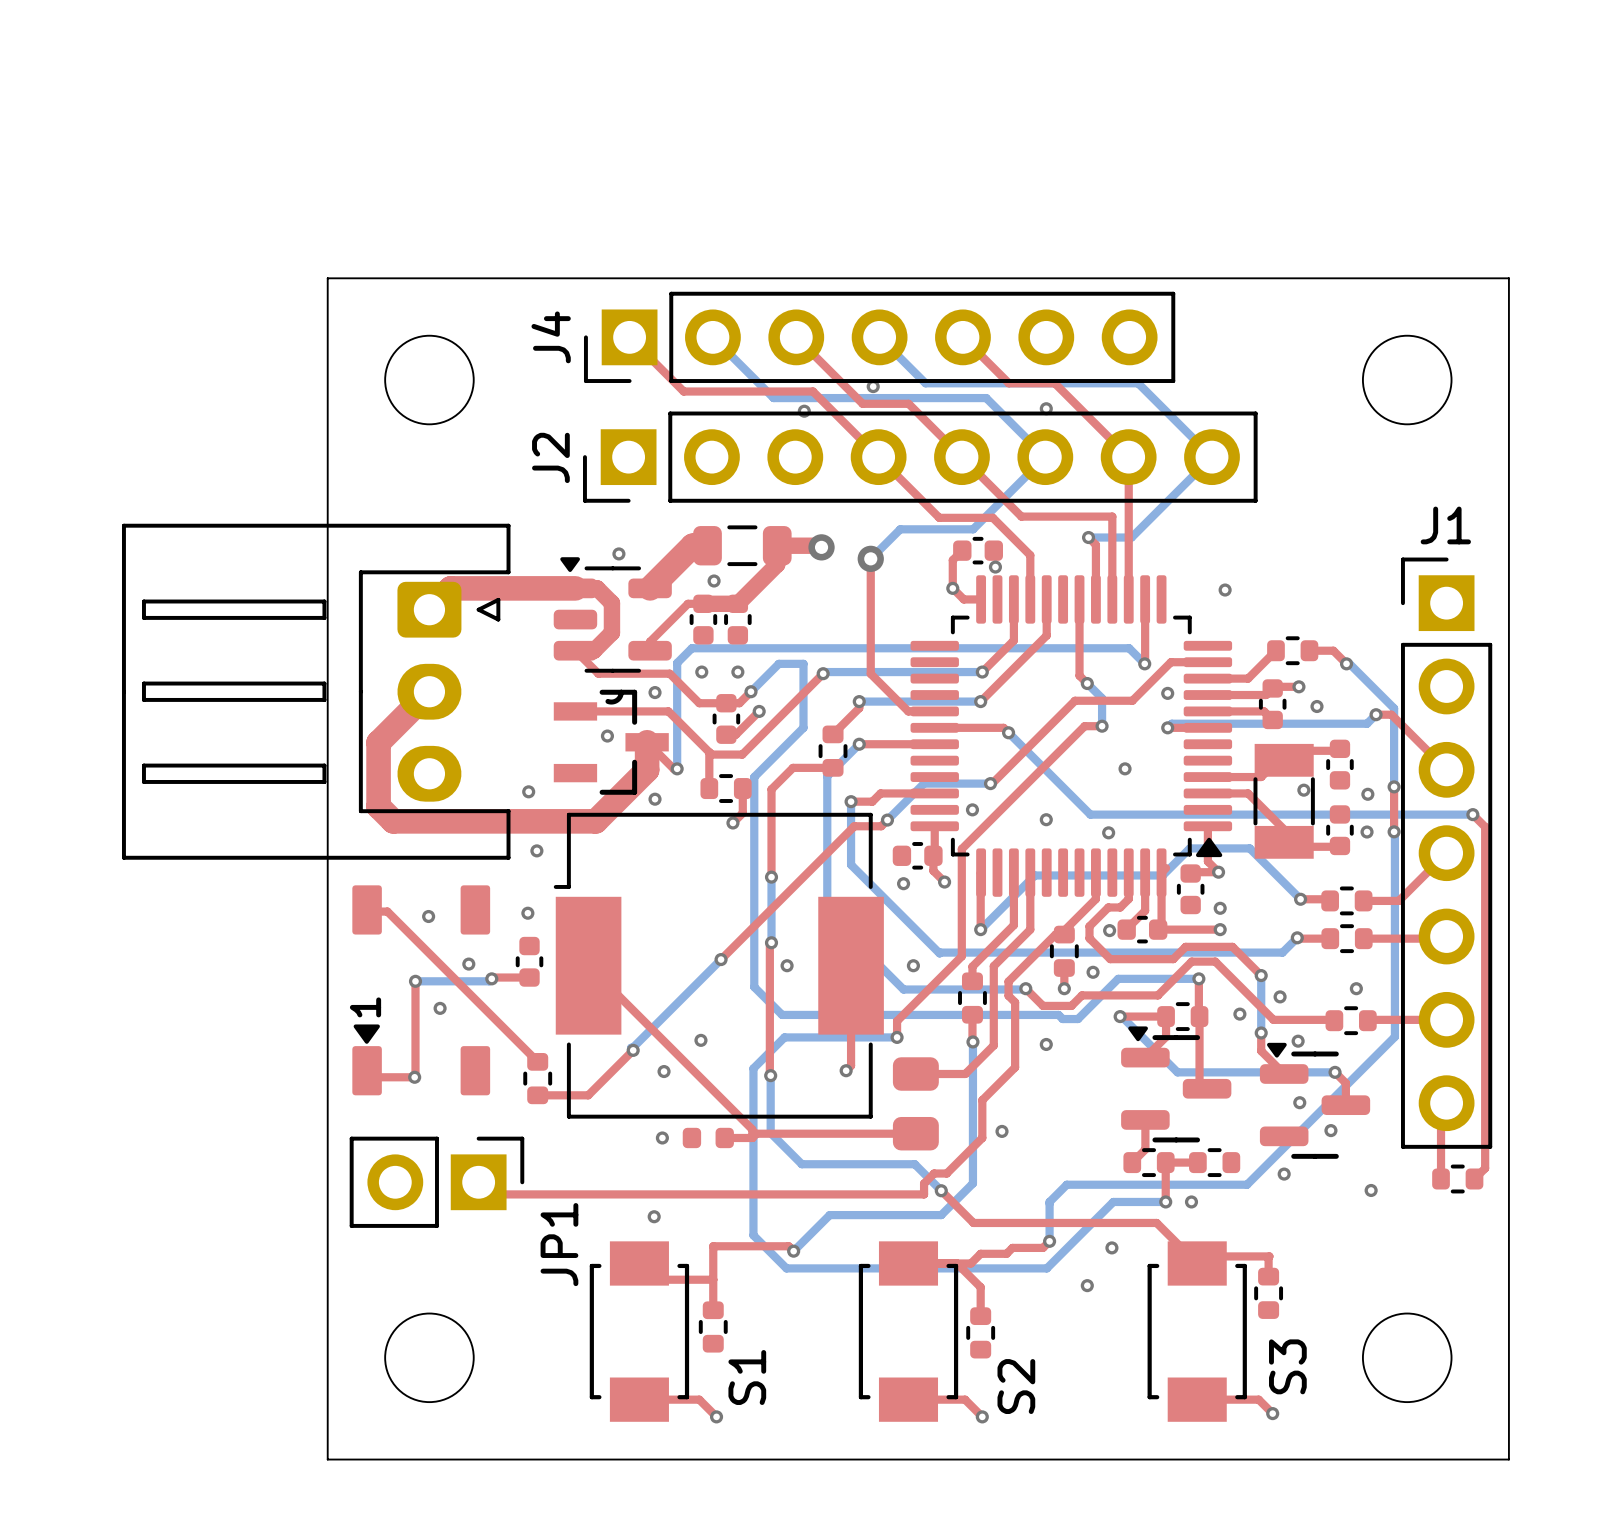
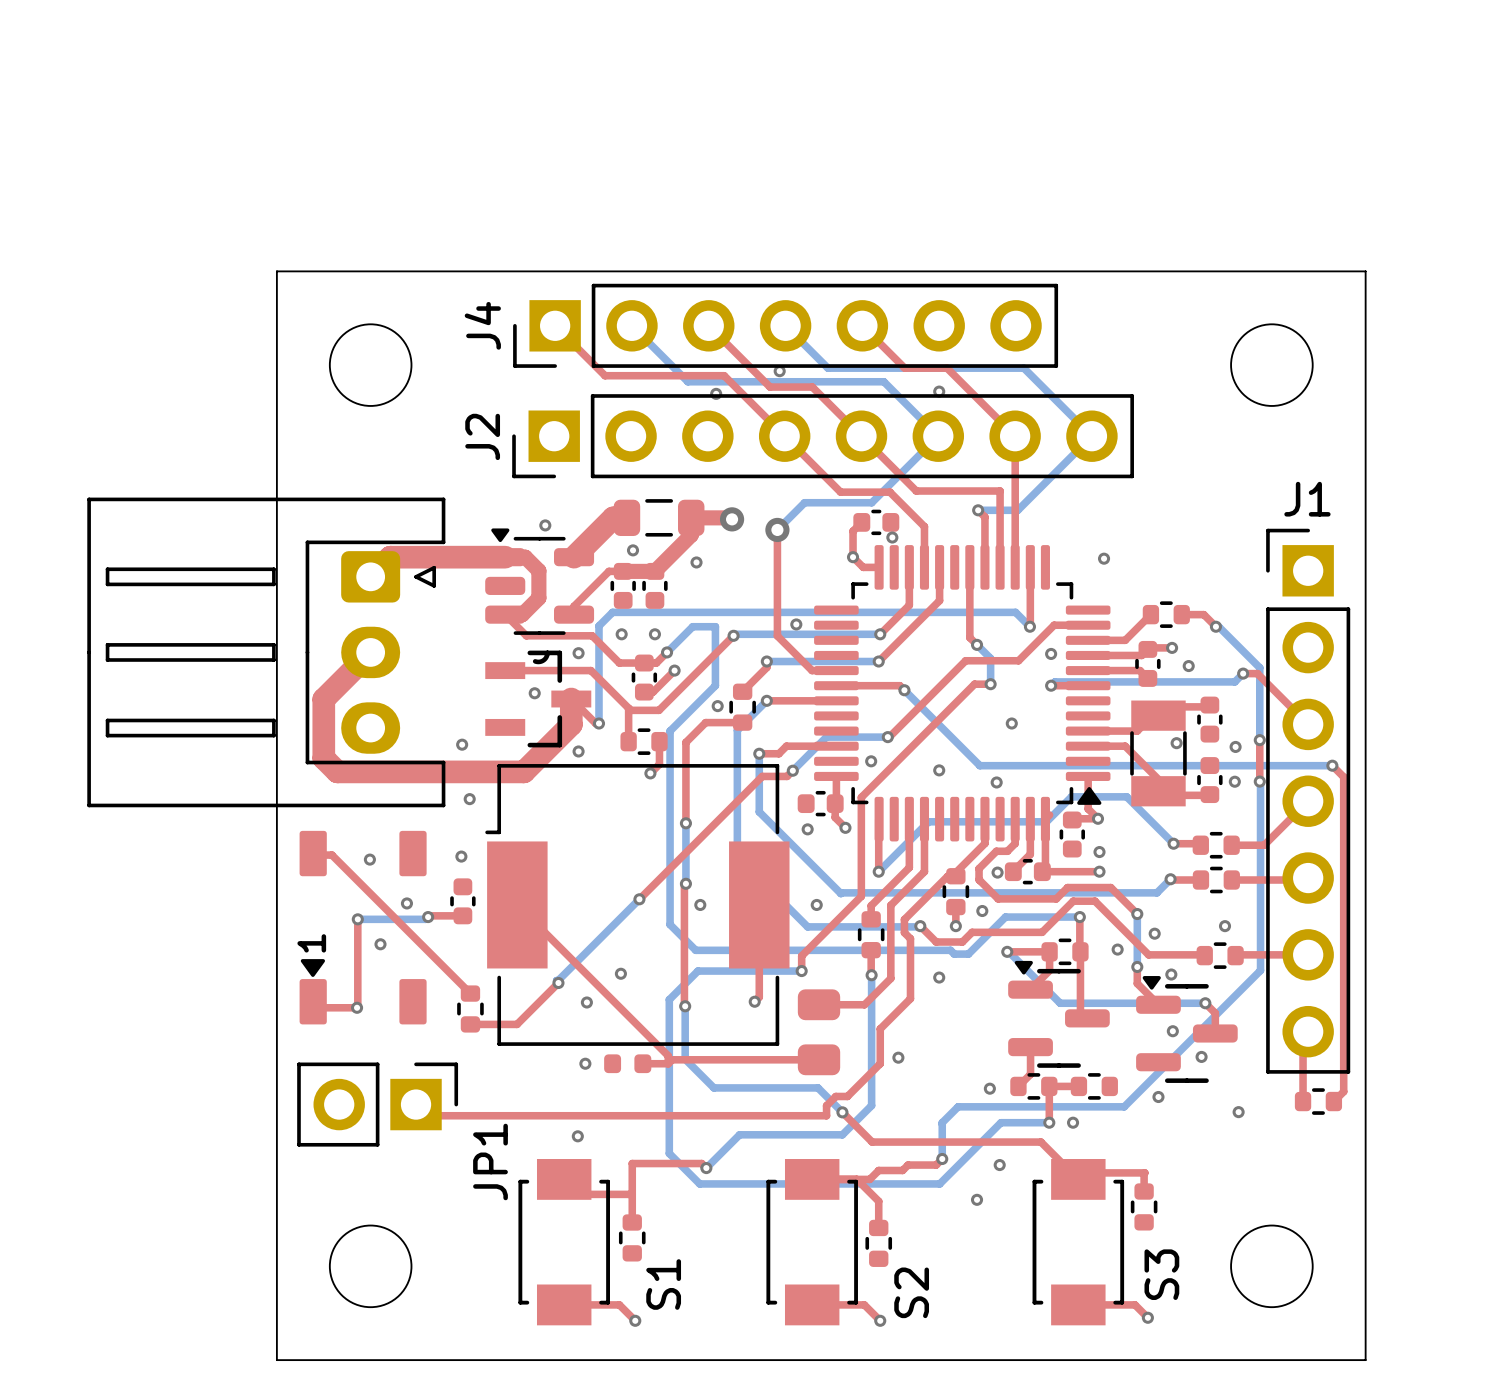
via: none -> (696, 562)
via: none -> (796, 624)
via: none -> (717, 706)
via: none -> (989, 1088)

